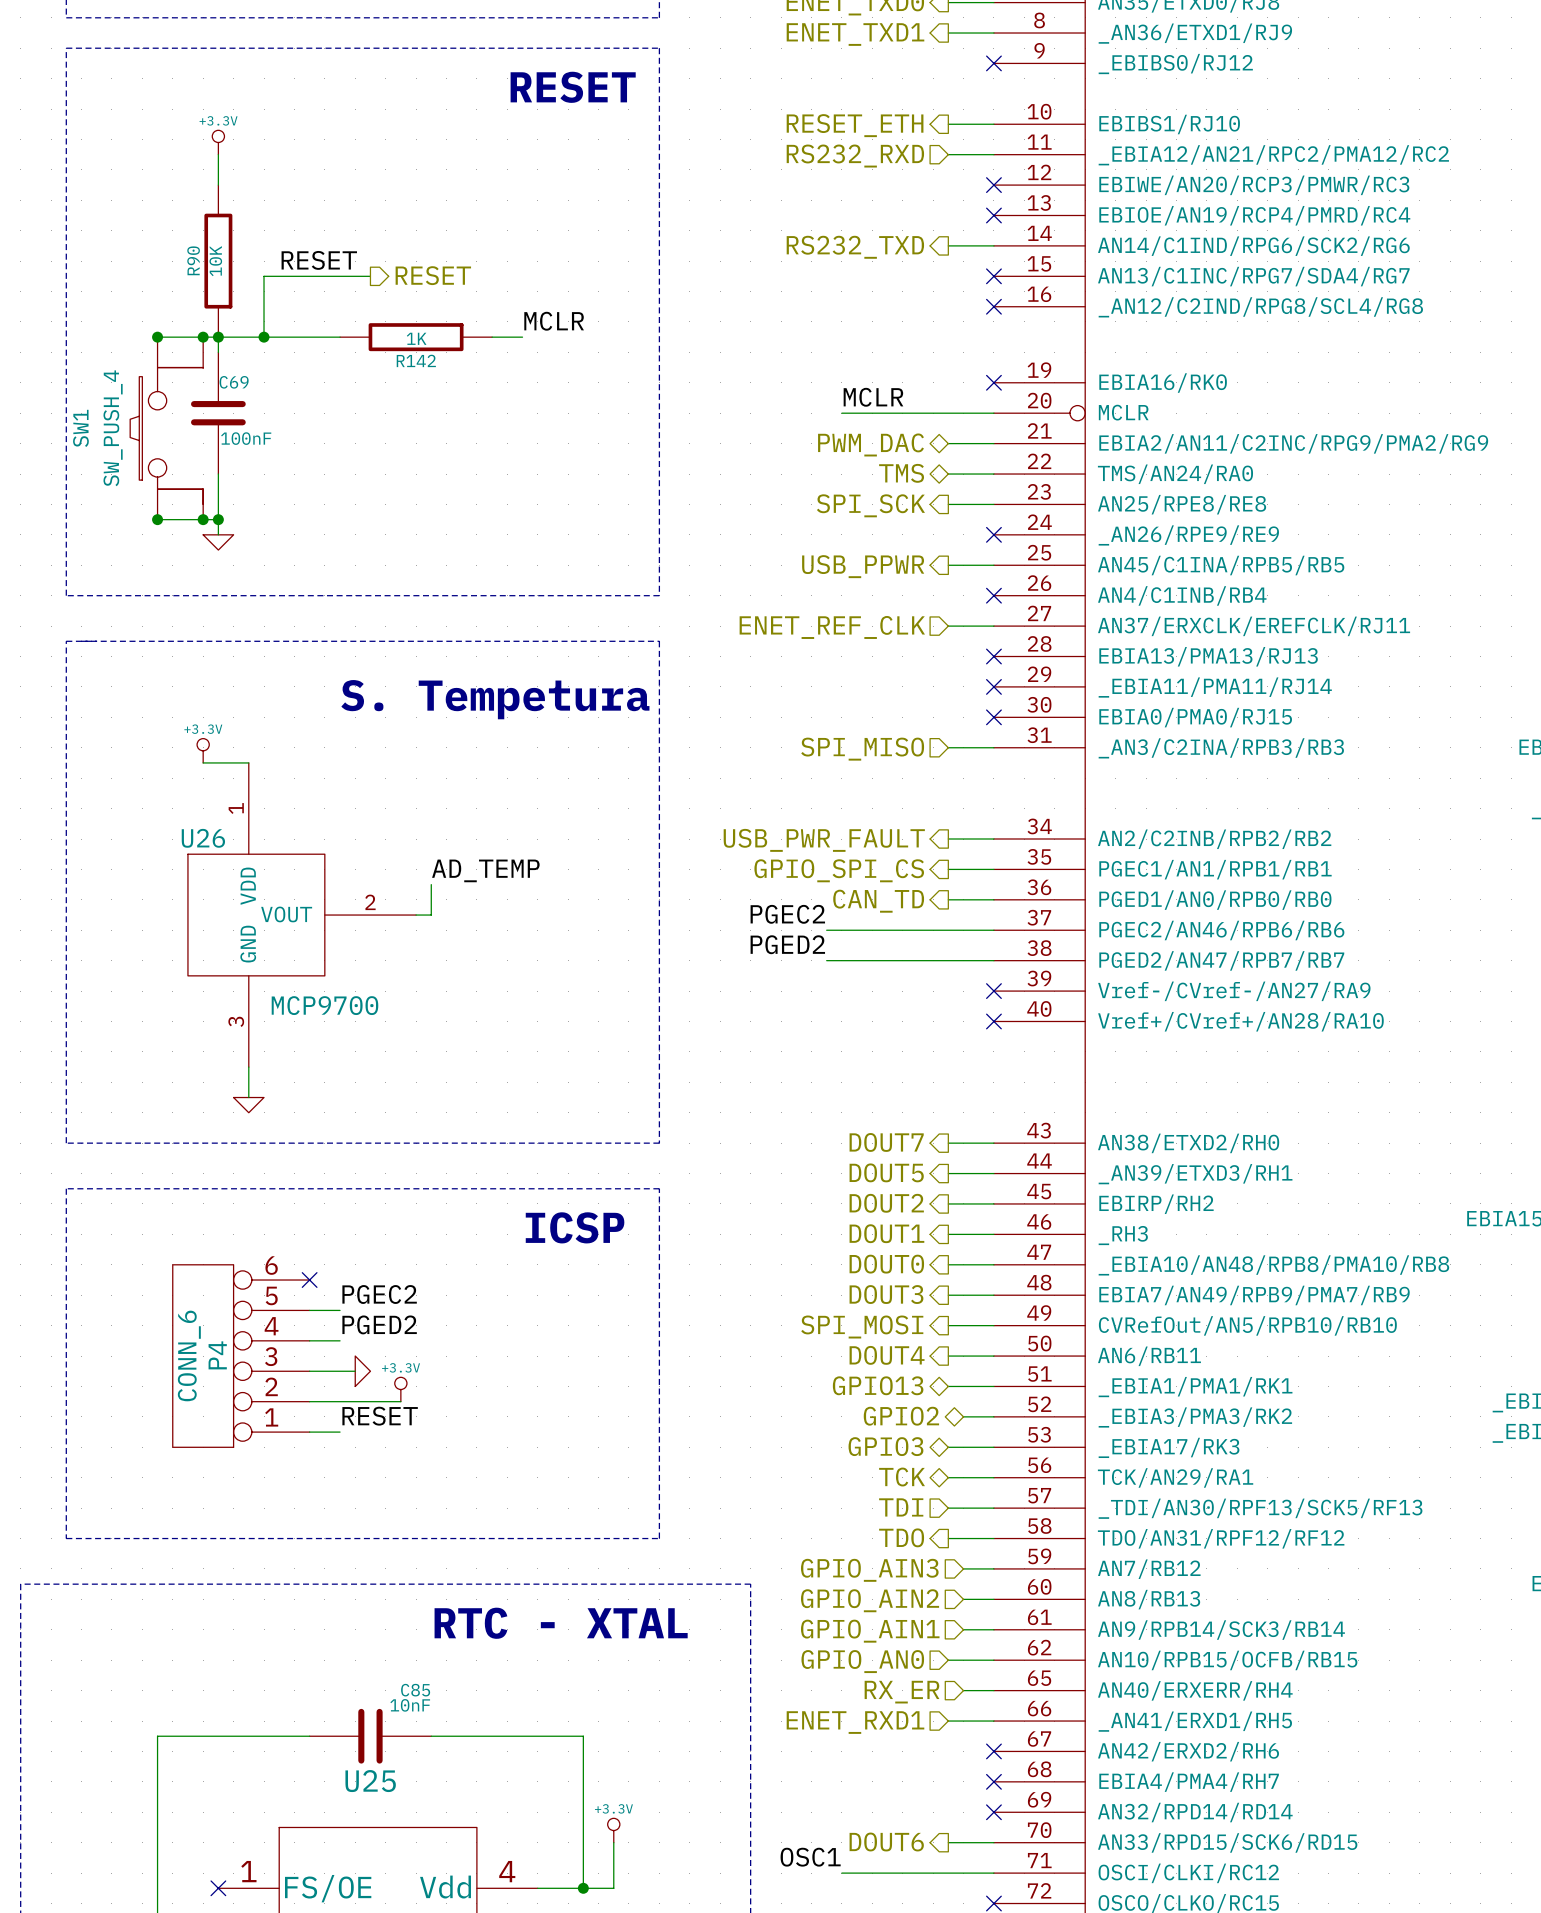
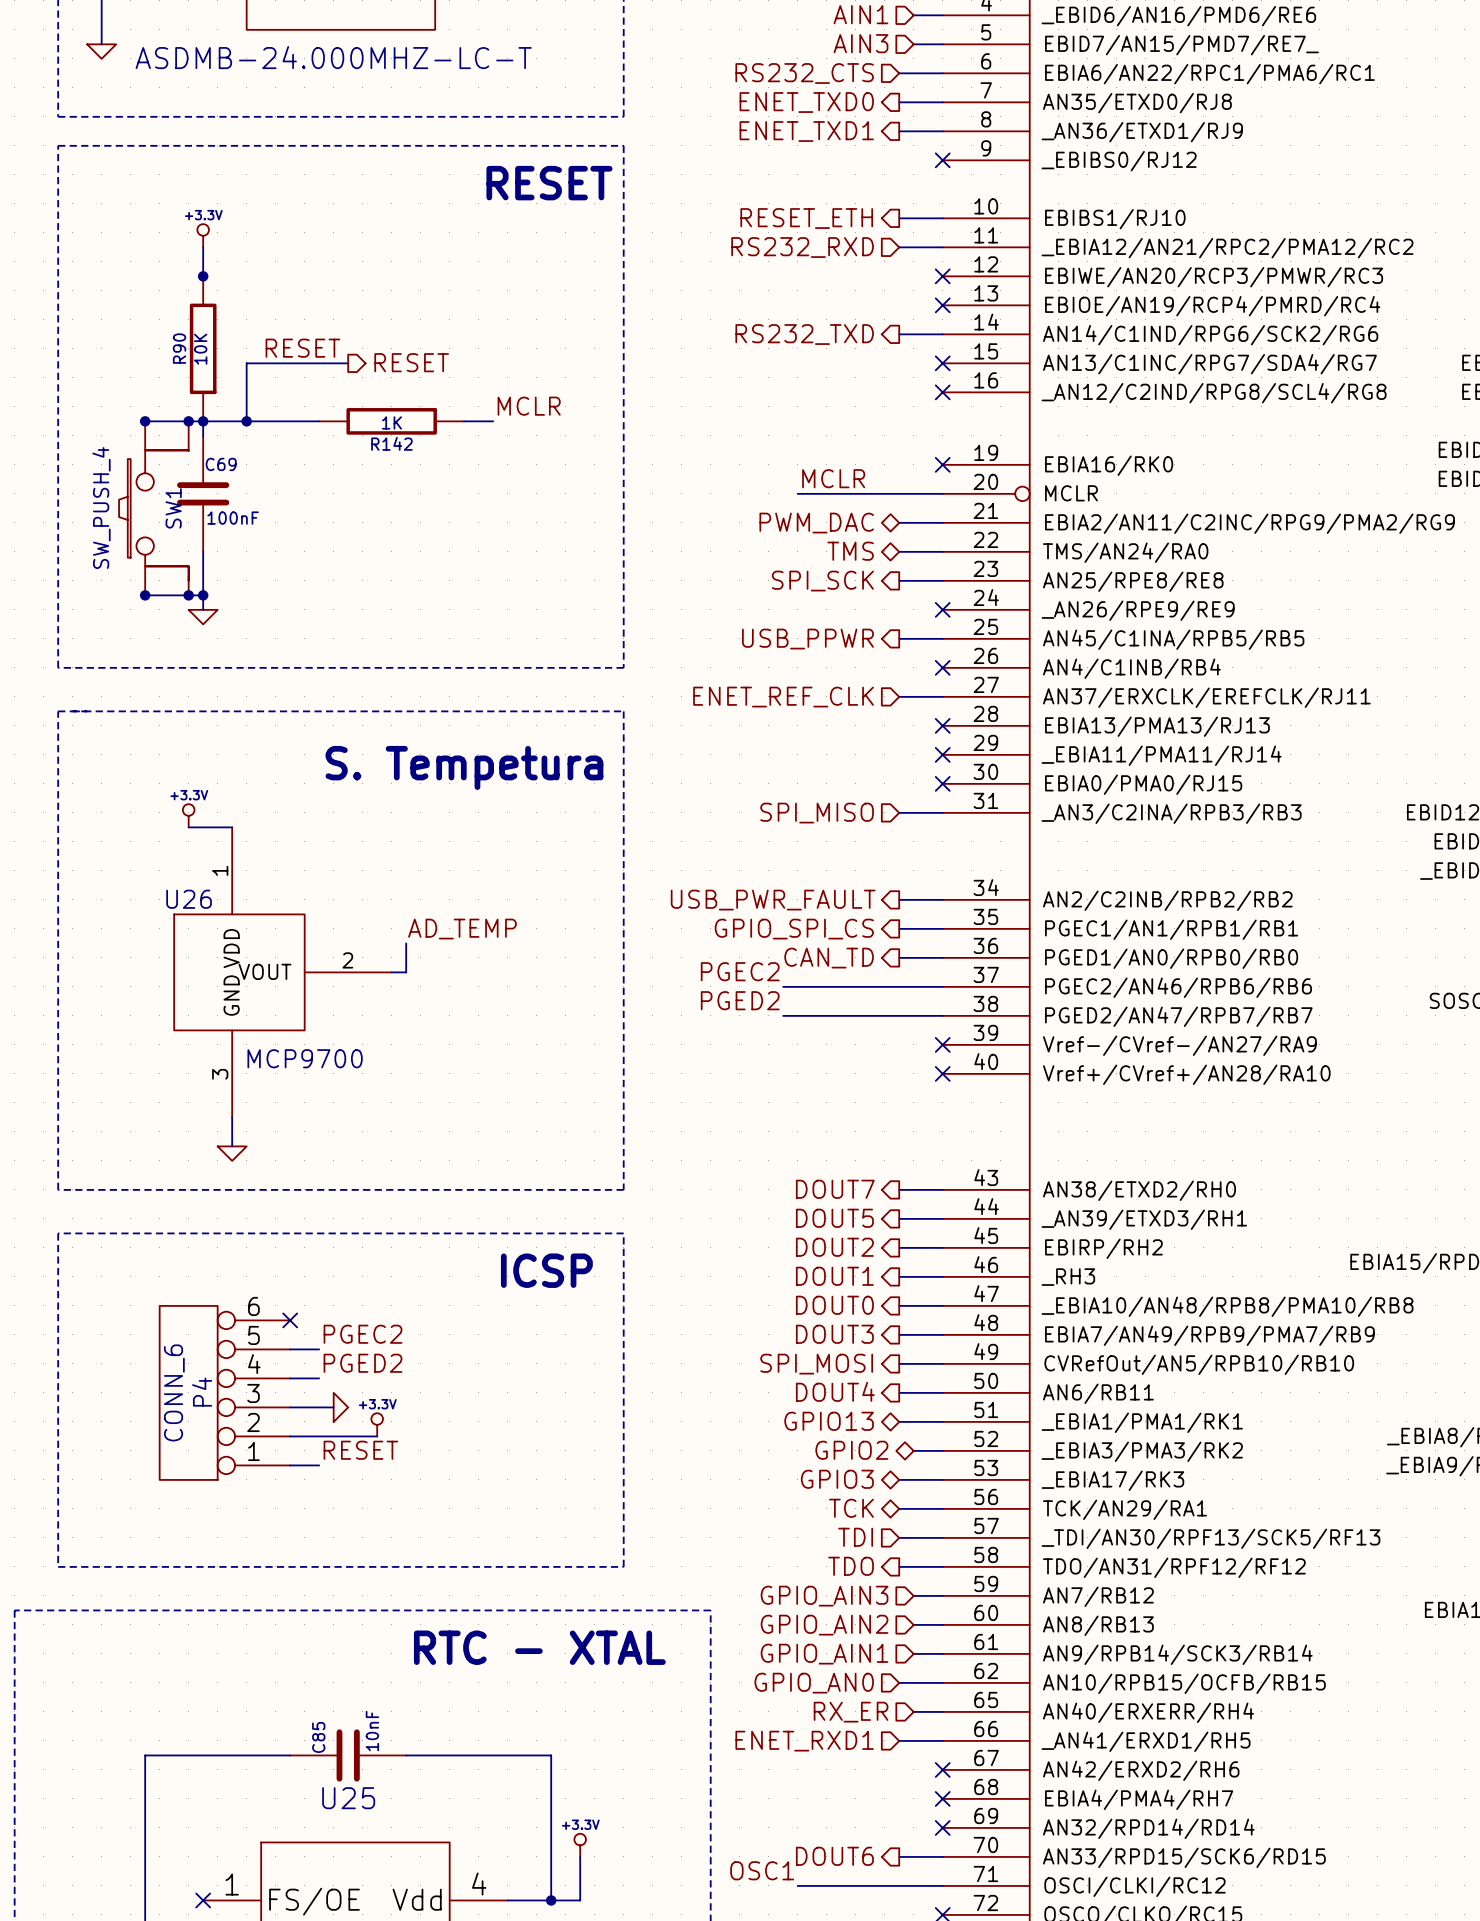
junction: none -> (203, 276)
SW1 name position: SW1 (80, 428) -> SW1 (173, 508)
C85 name rotation: 0° (415, 1690) -> 90° counterclockwise (318, 1737)
C85 name position: C85 (415, 1690) -> C85 (318, 1737)
C85 value rotation: 0° (410, 1705) -> 90° counterclockwise (372, 1731)

